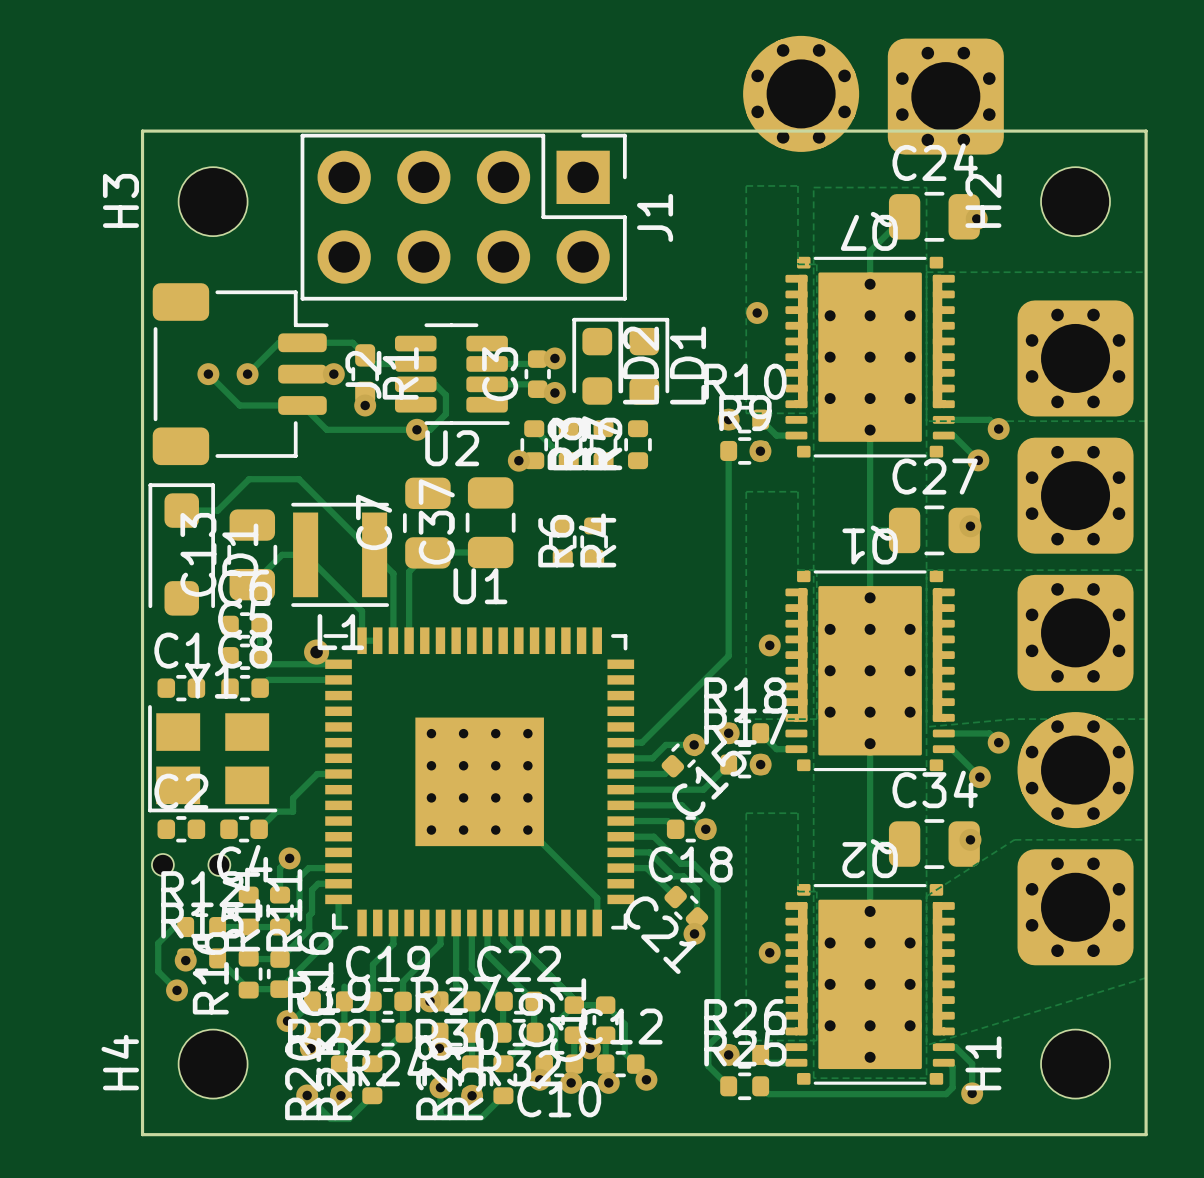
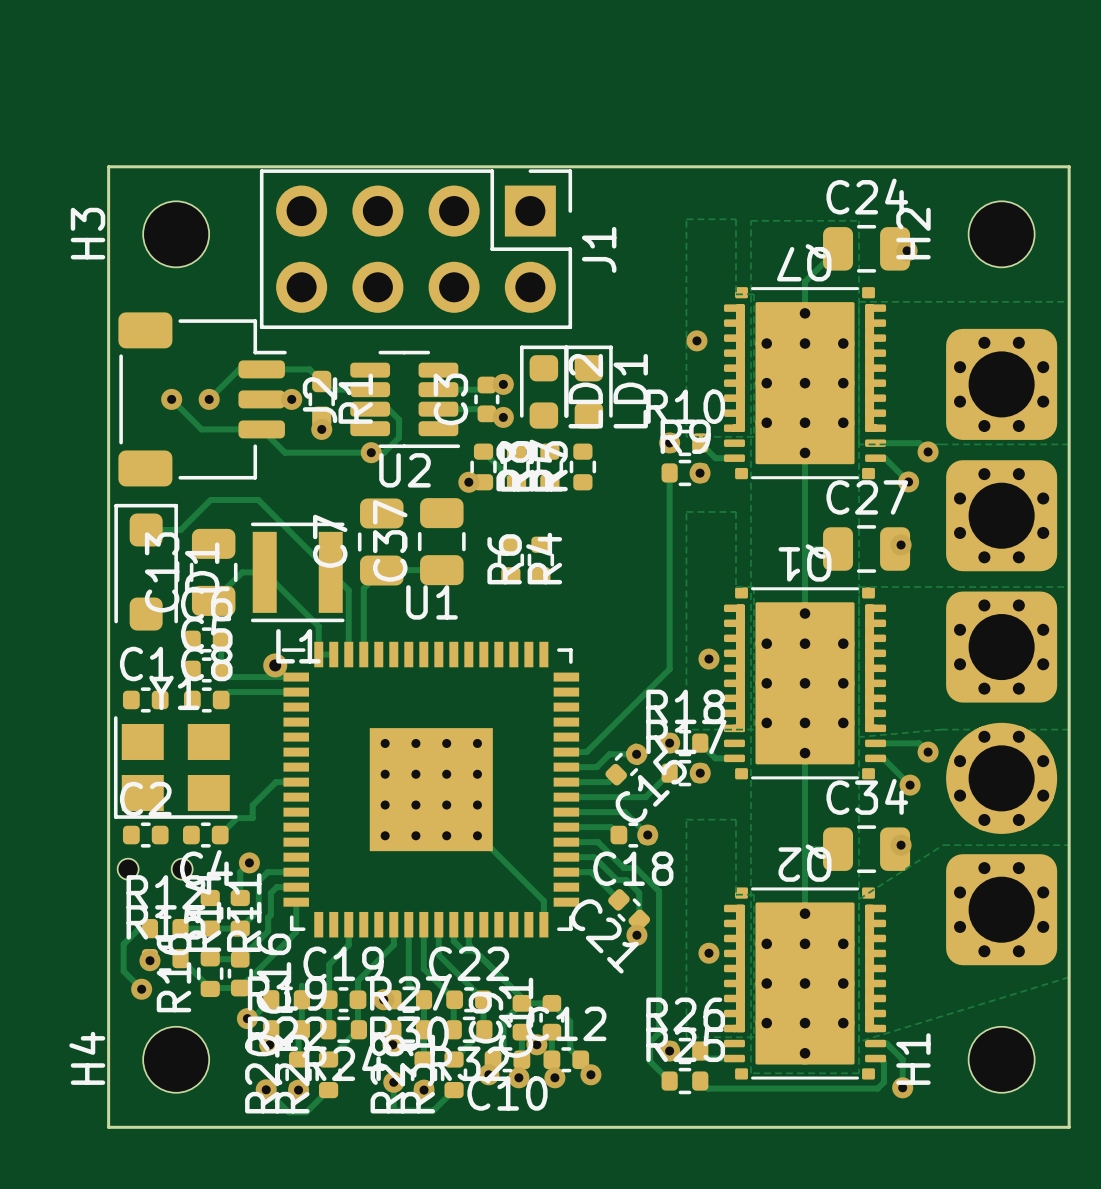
part: (801, 93) -> none
part: (945, 96) -> none

